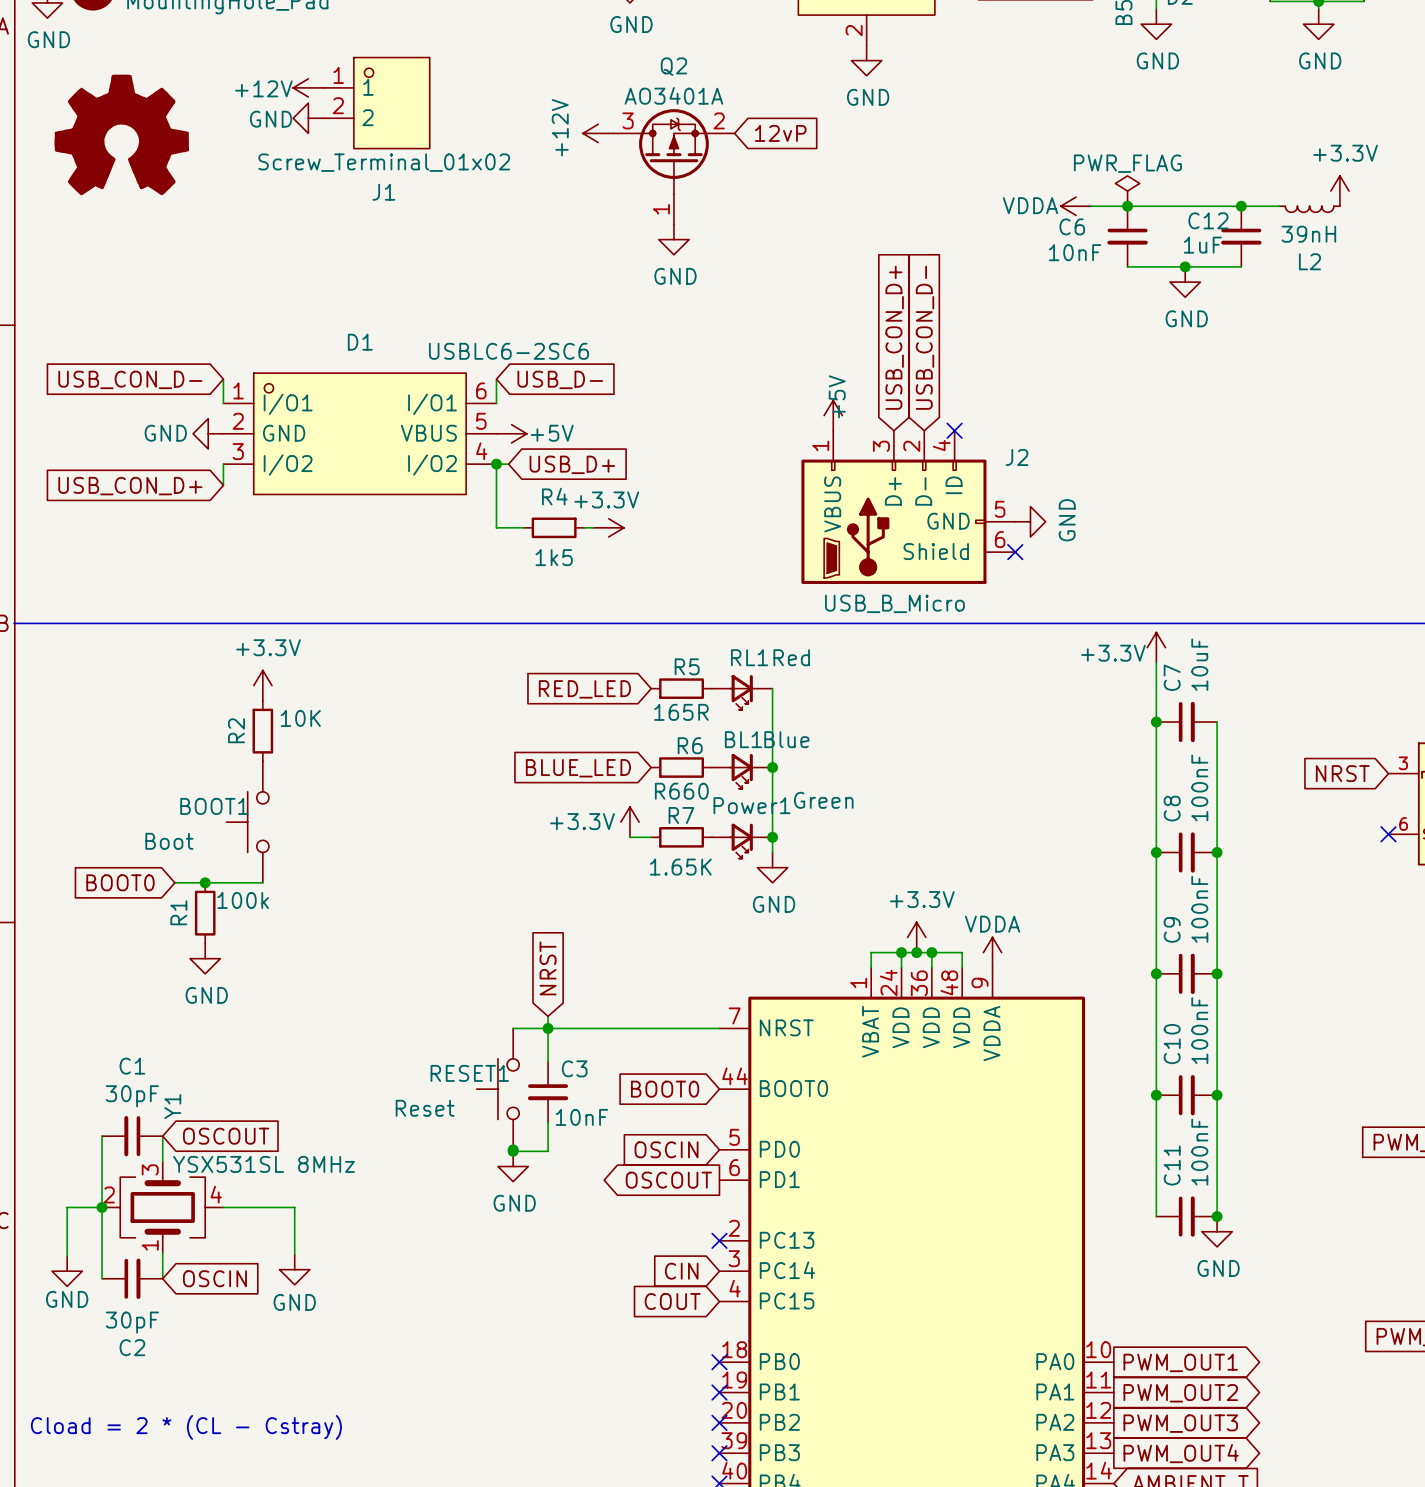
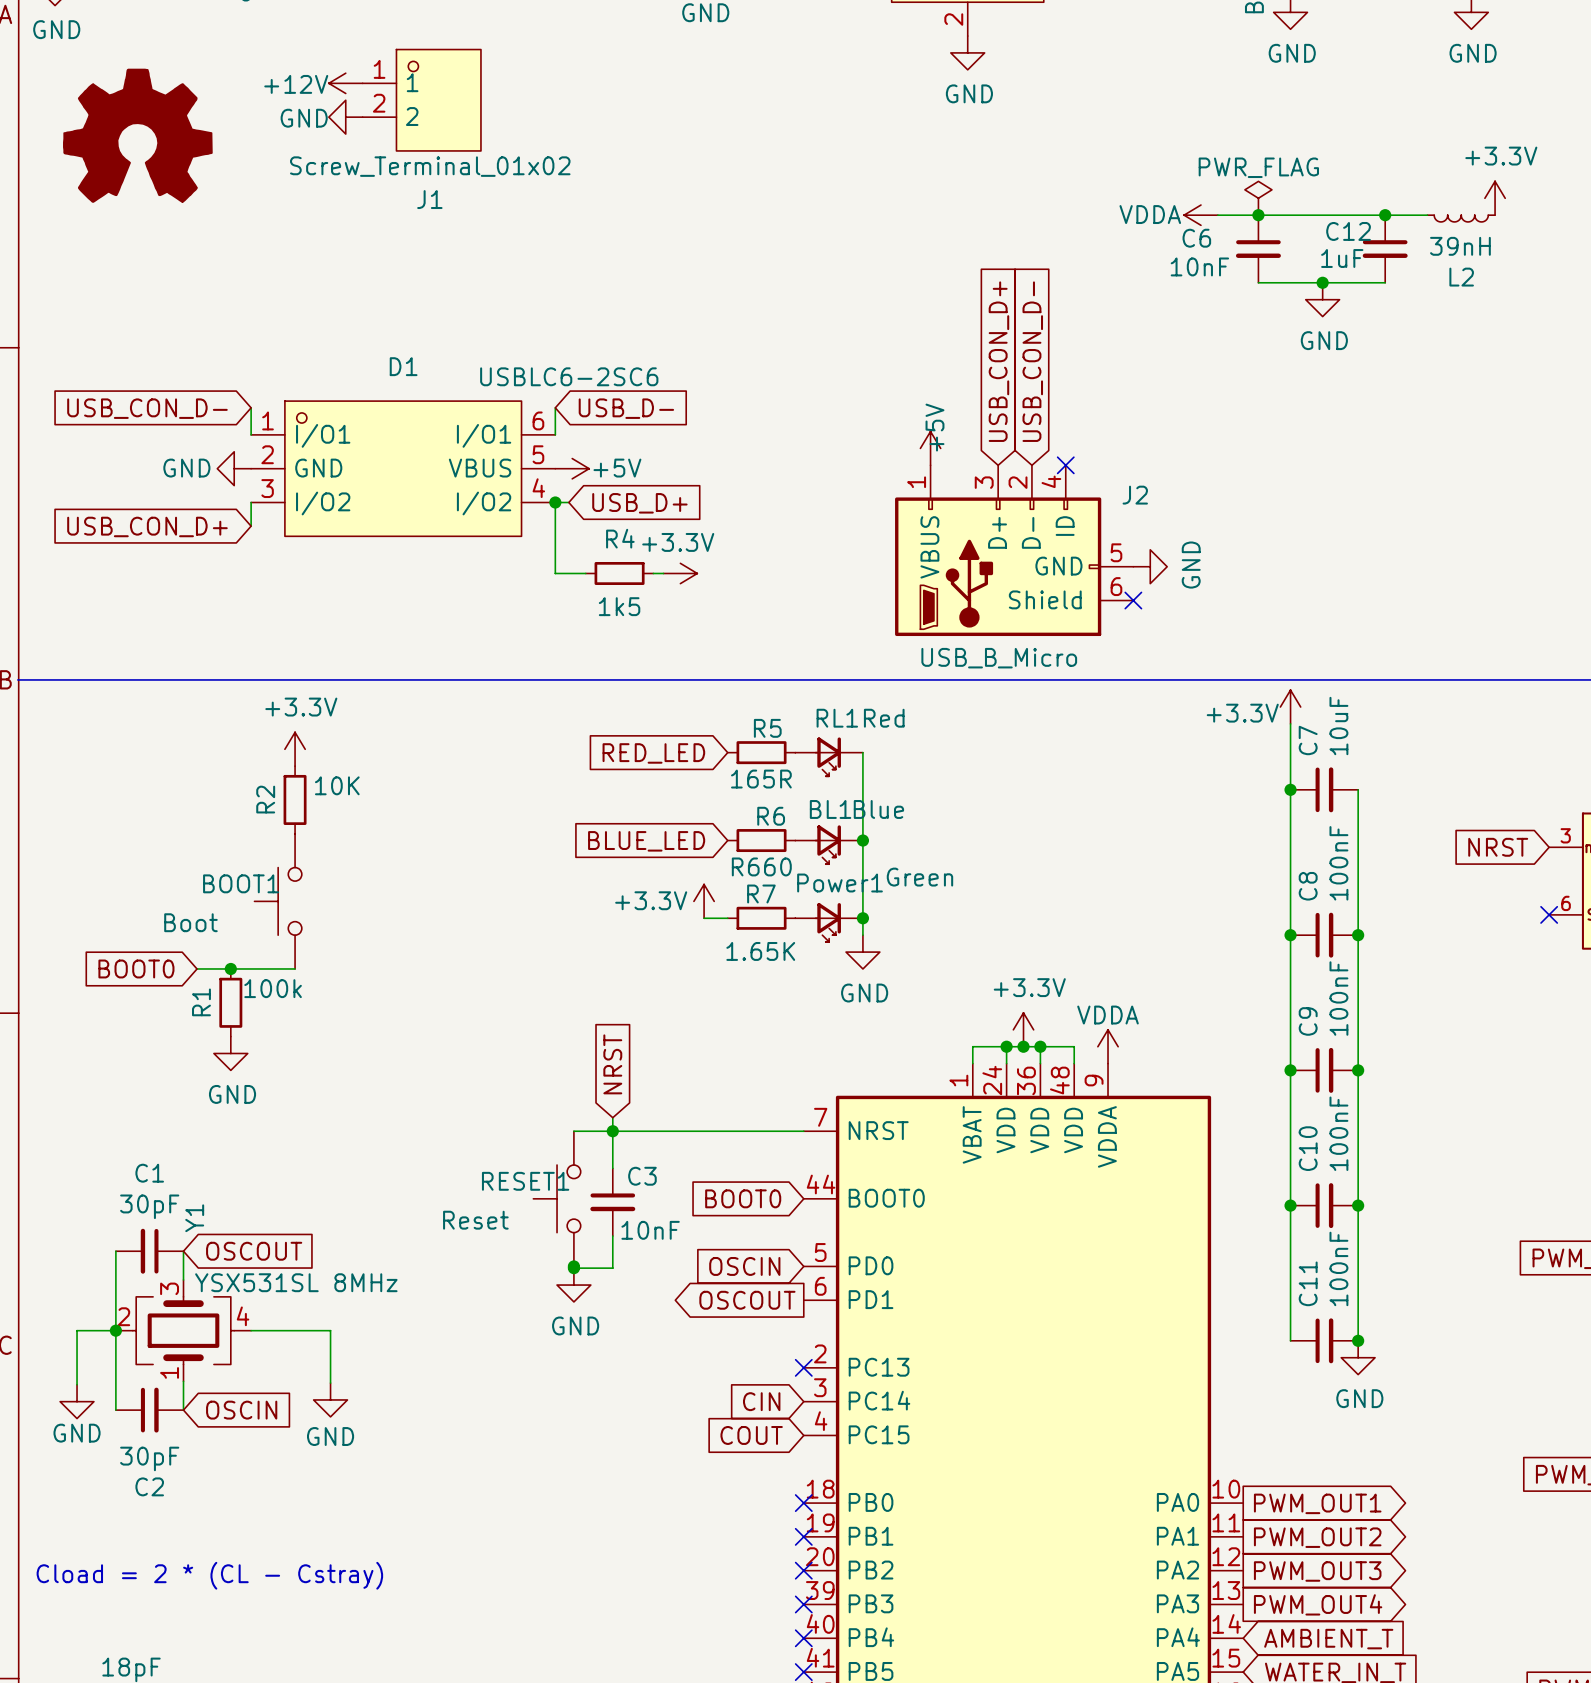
power symbol: +12V (598, 133) -> none
global label: 12vP (780, 133) -> none
Q2: AO3401A (673, 166) -> none
power symbol: GND (673, 239) -> none

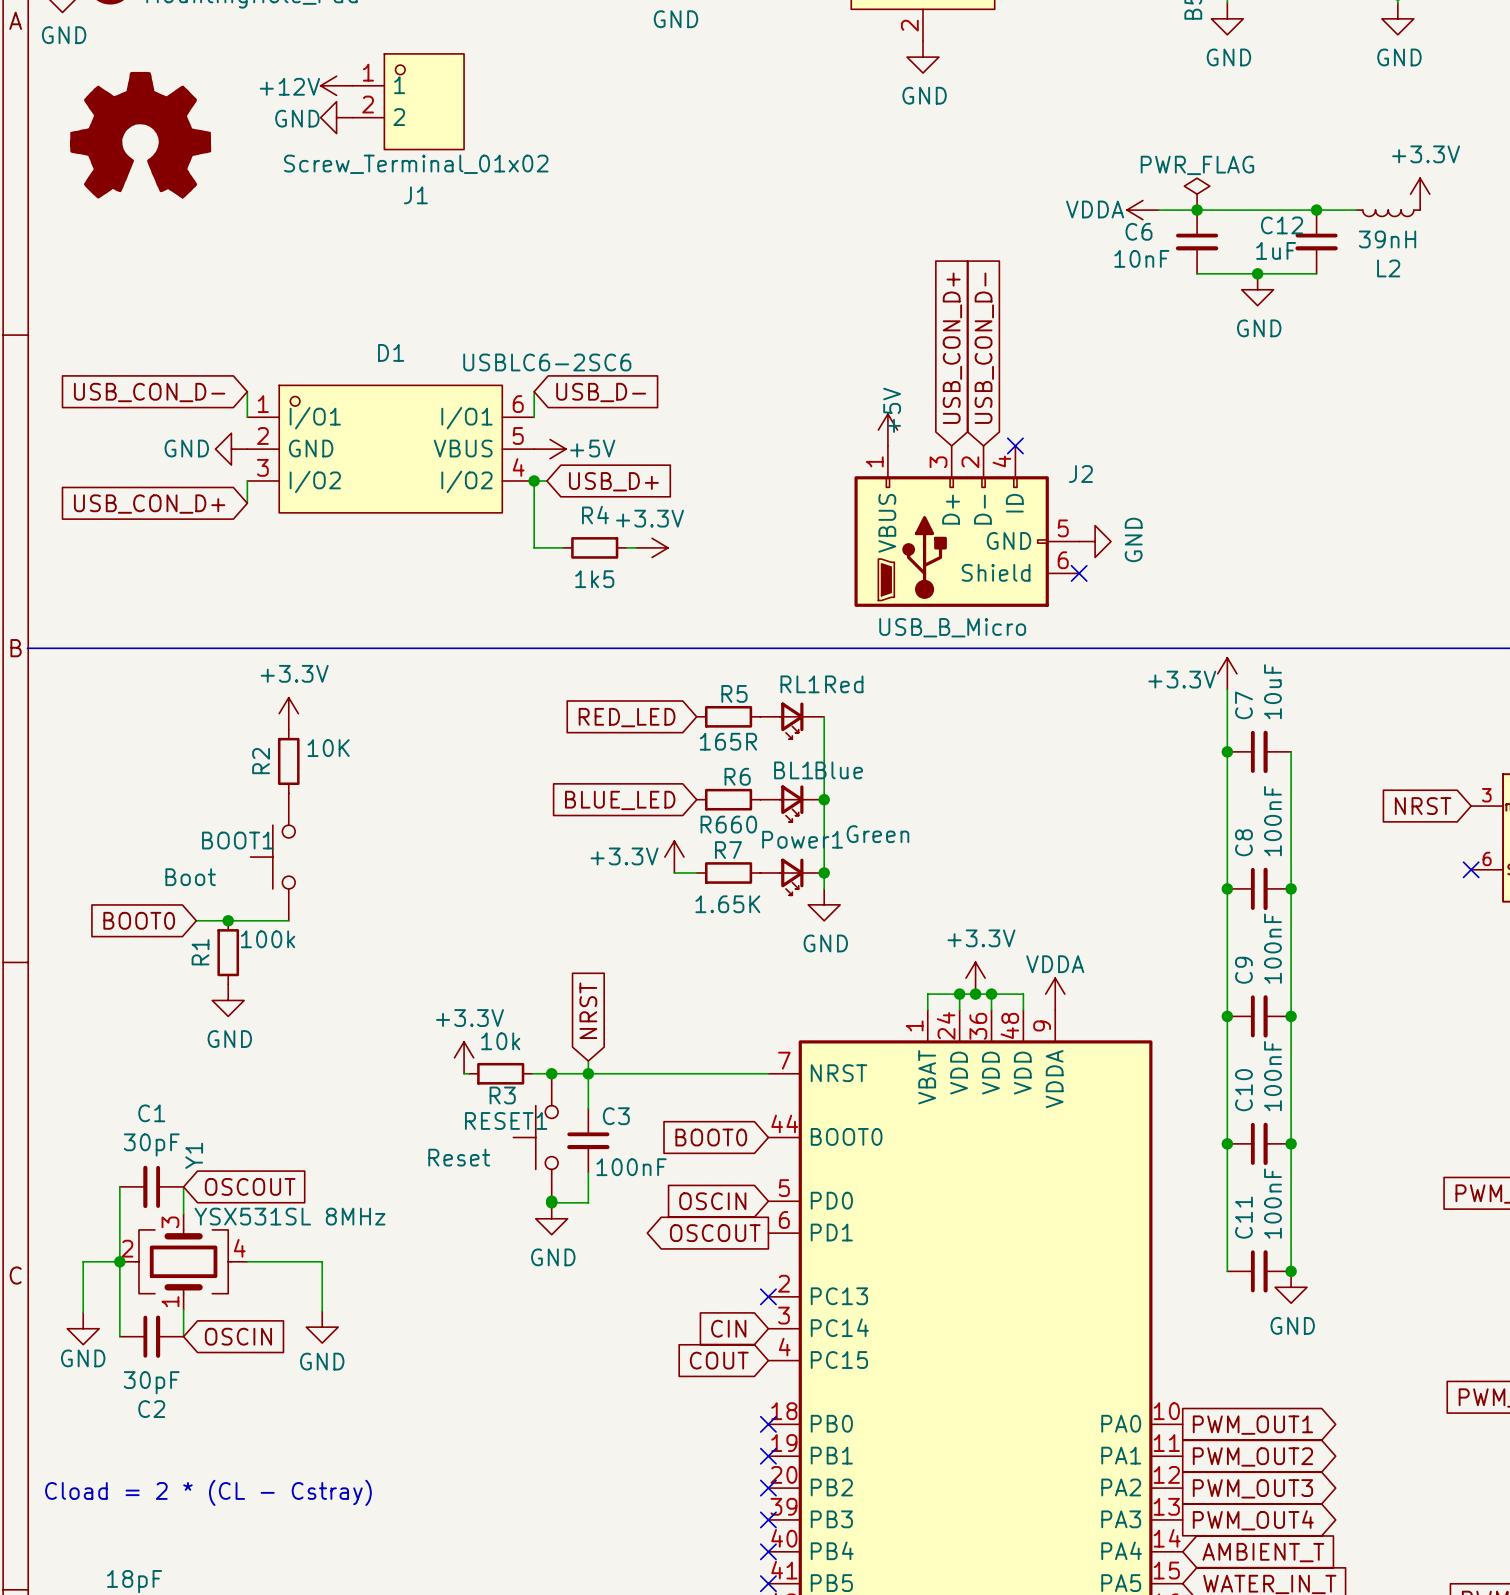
power symbol: none -> +3.3V (464, 1057)
wire: none -> (464, 1073) (468, 1073)
R3: none -> 10k (500, 1073)
wire: none -> (532, 1073) (551, 1073)
junction: none -> (551, 1073)
C3 value: 10nF (650, 1230) -> 100nF (631, 1167)

